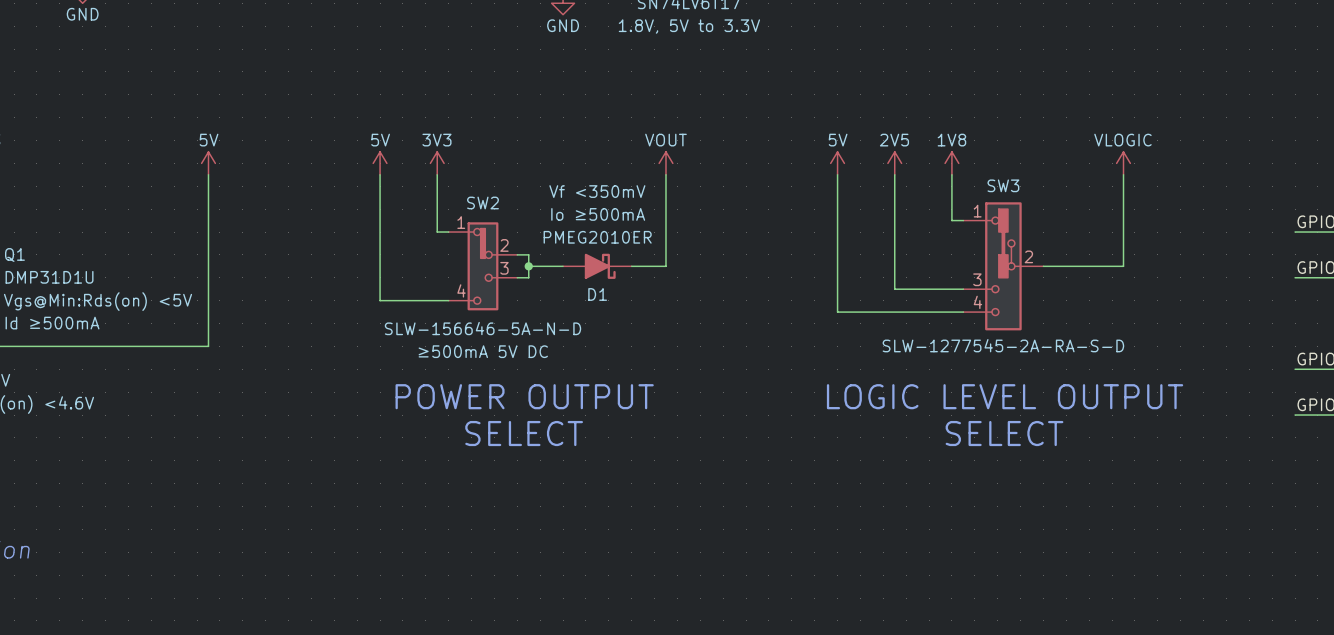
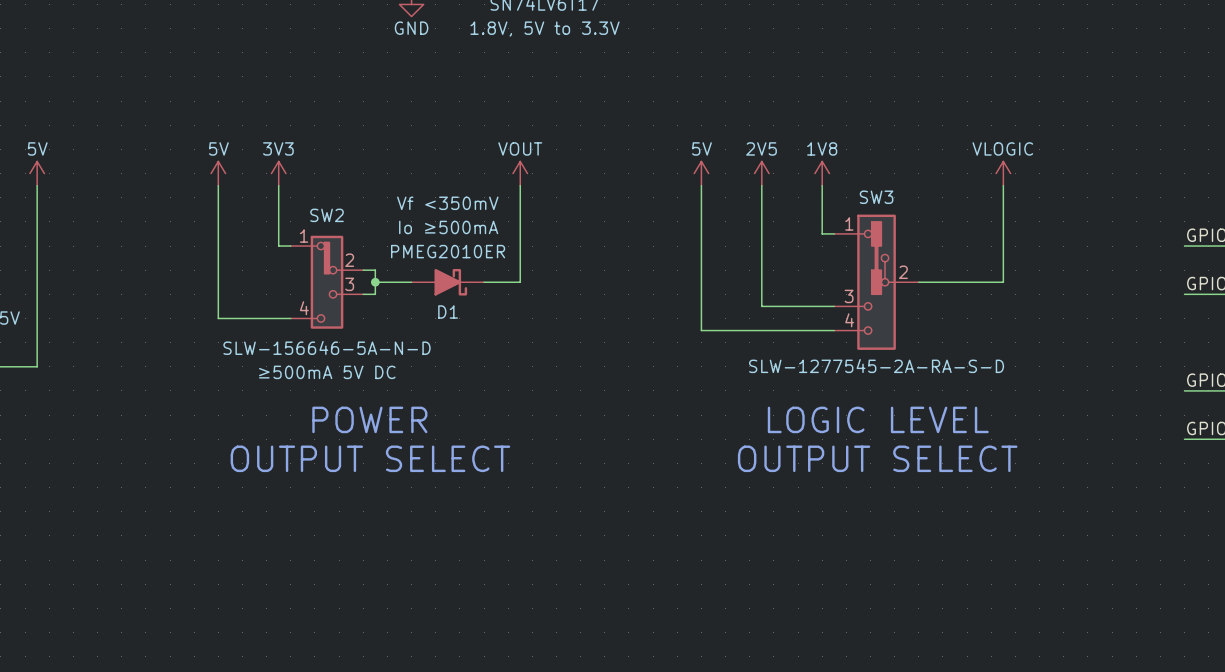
text: POWER OUTPUT (524, 396) -> POWER (369, 419)
text: LOGIC LEVEL OUTPUT (1005, 396) -> LOGIC LEVEL (878, 419)
text: SELECT (524, 433) -> OUTPUT SELECT (370, 458)
text: SELECT (1004, 433) -> OUTPUT SELECT (877, 458)

